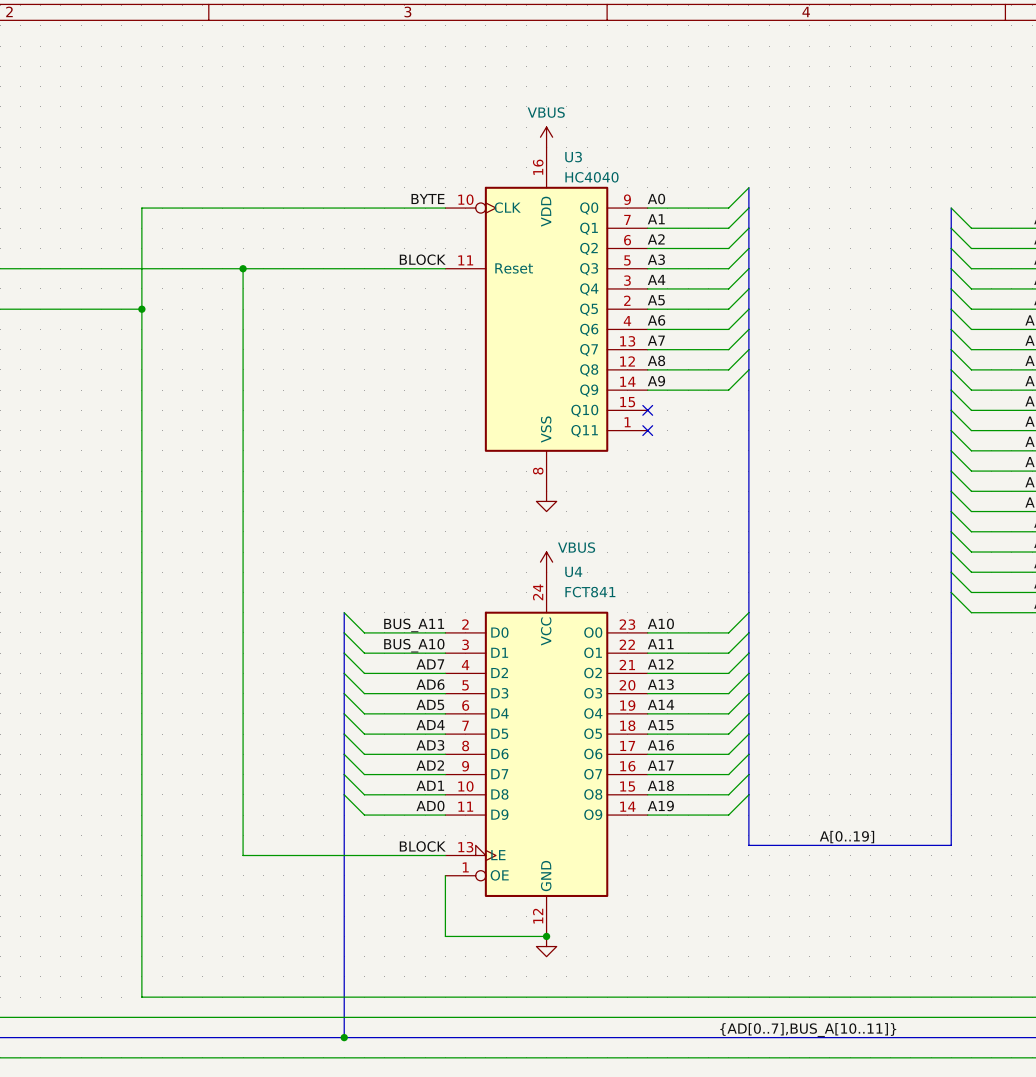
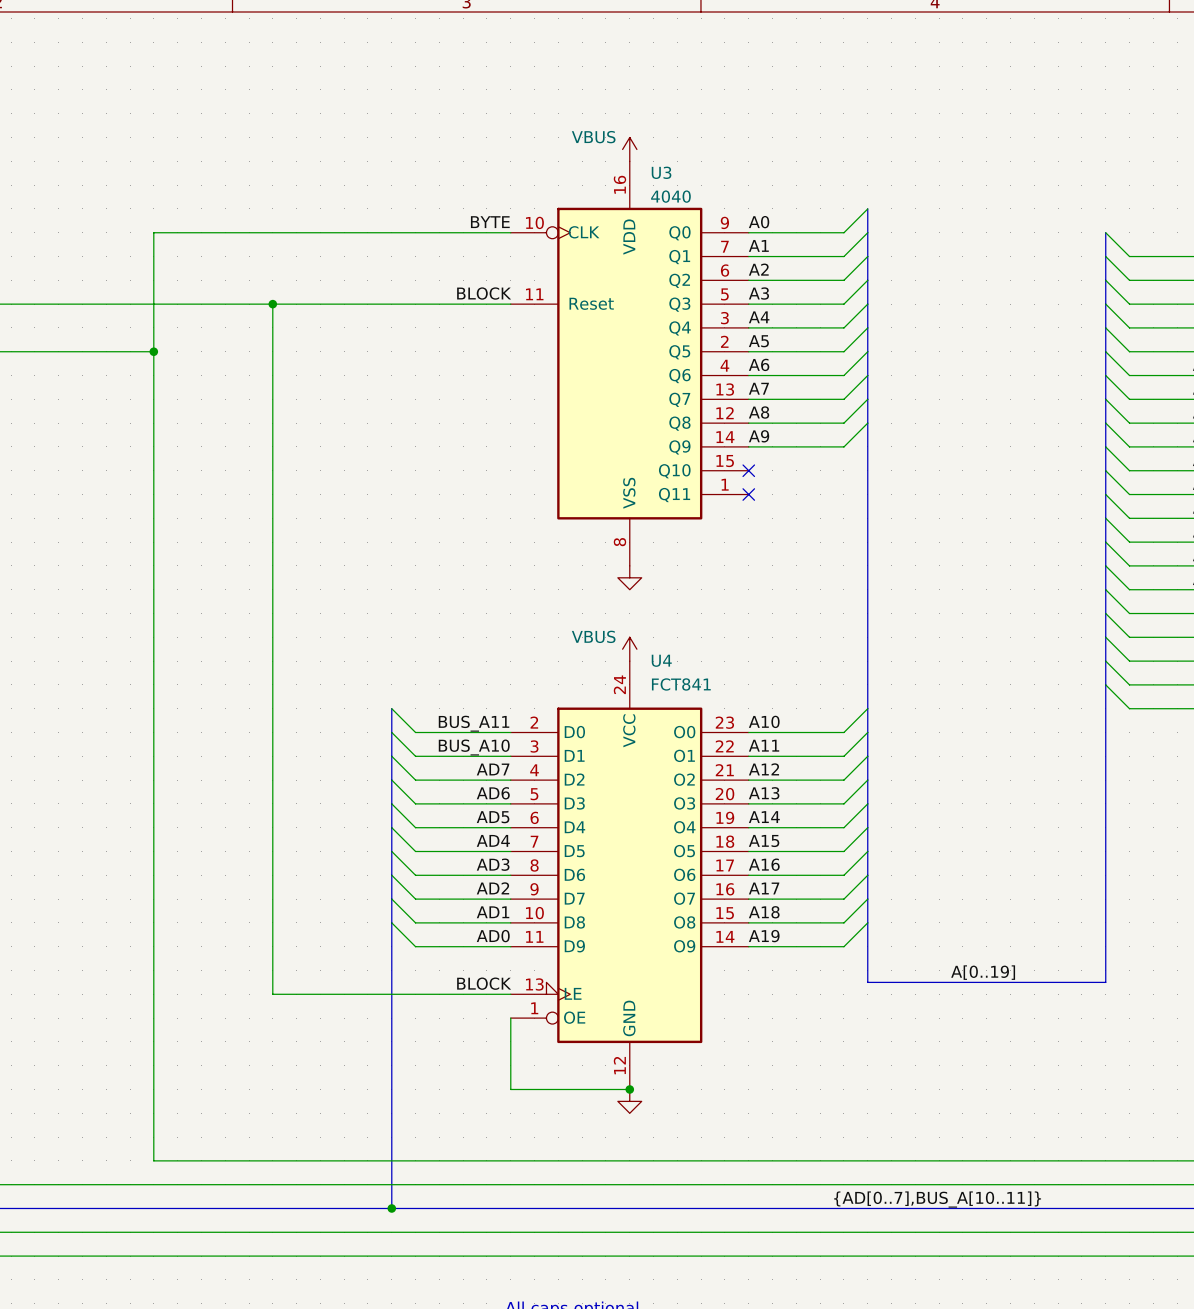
power symbol text position: VBUS (546, 112) -> VBUS (593, 137)
U3 value: HC4040 (591, 177) -> 4040 (670, 196)
power symbol text position: VBUS (576, 547) -> VBUS (593, 636)

